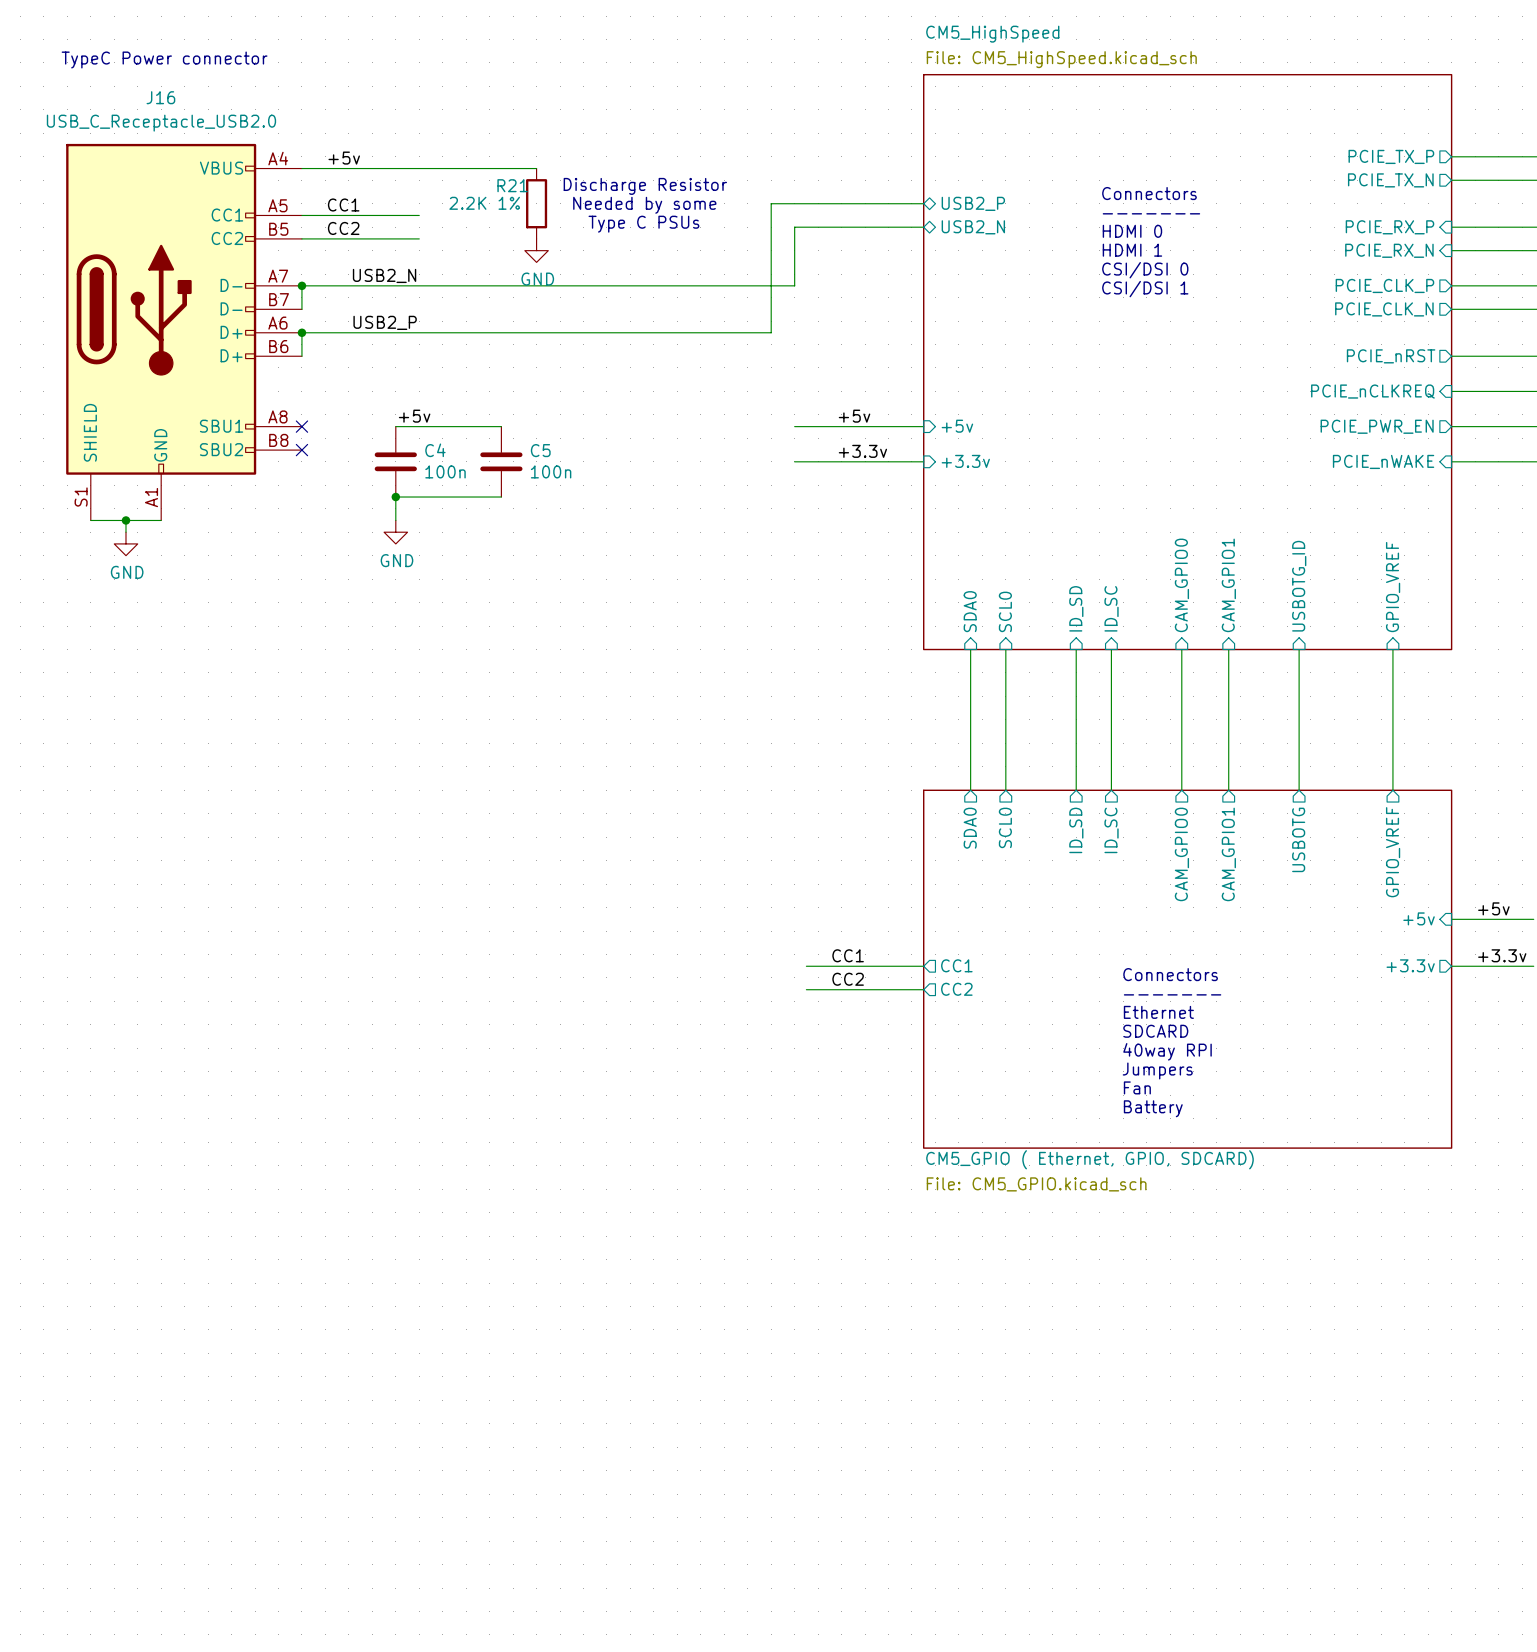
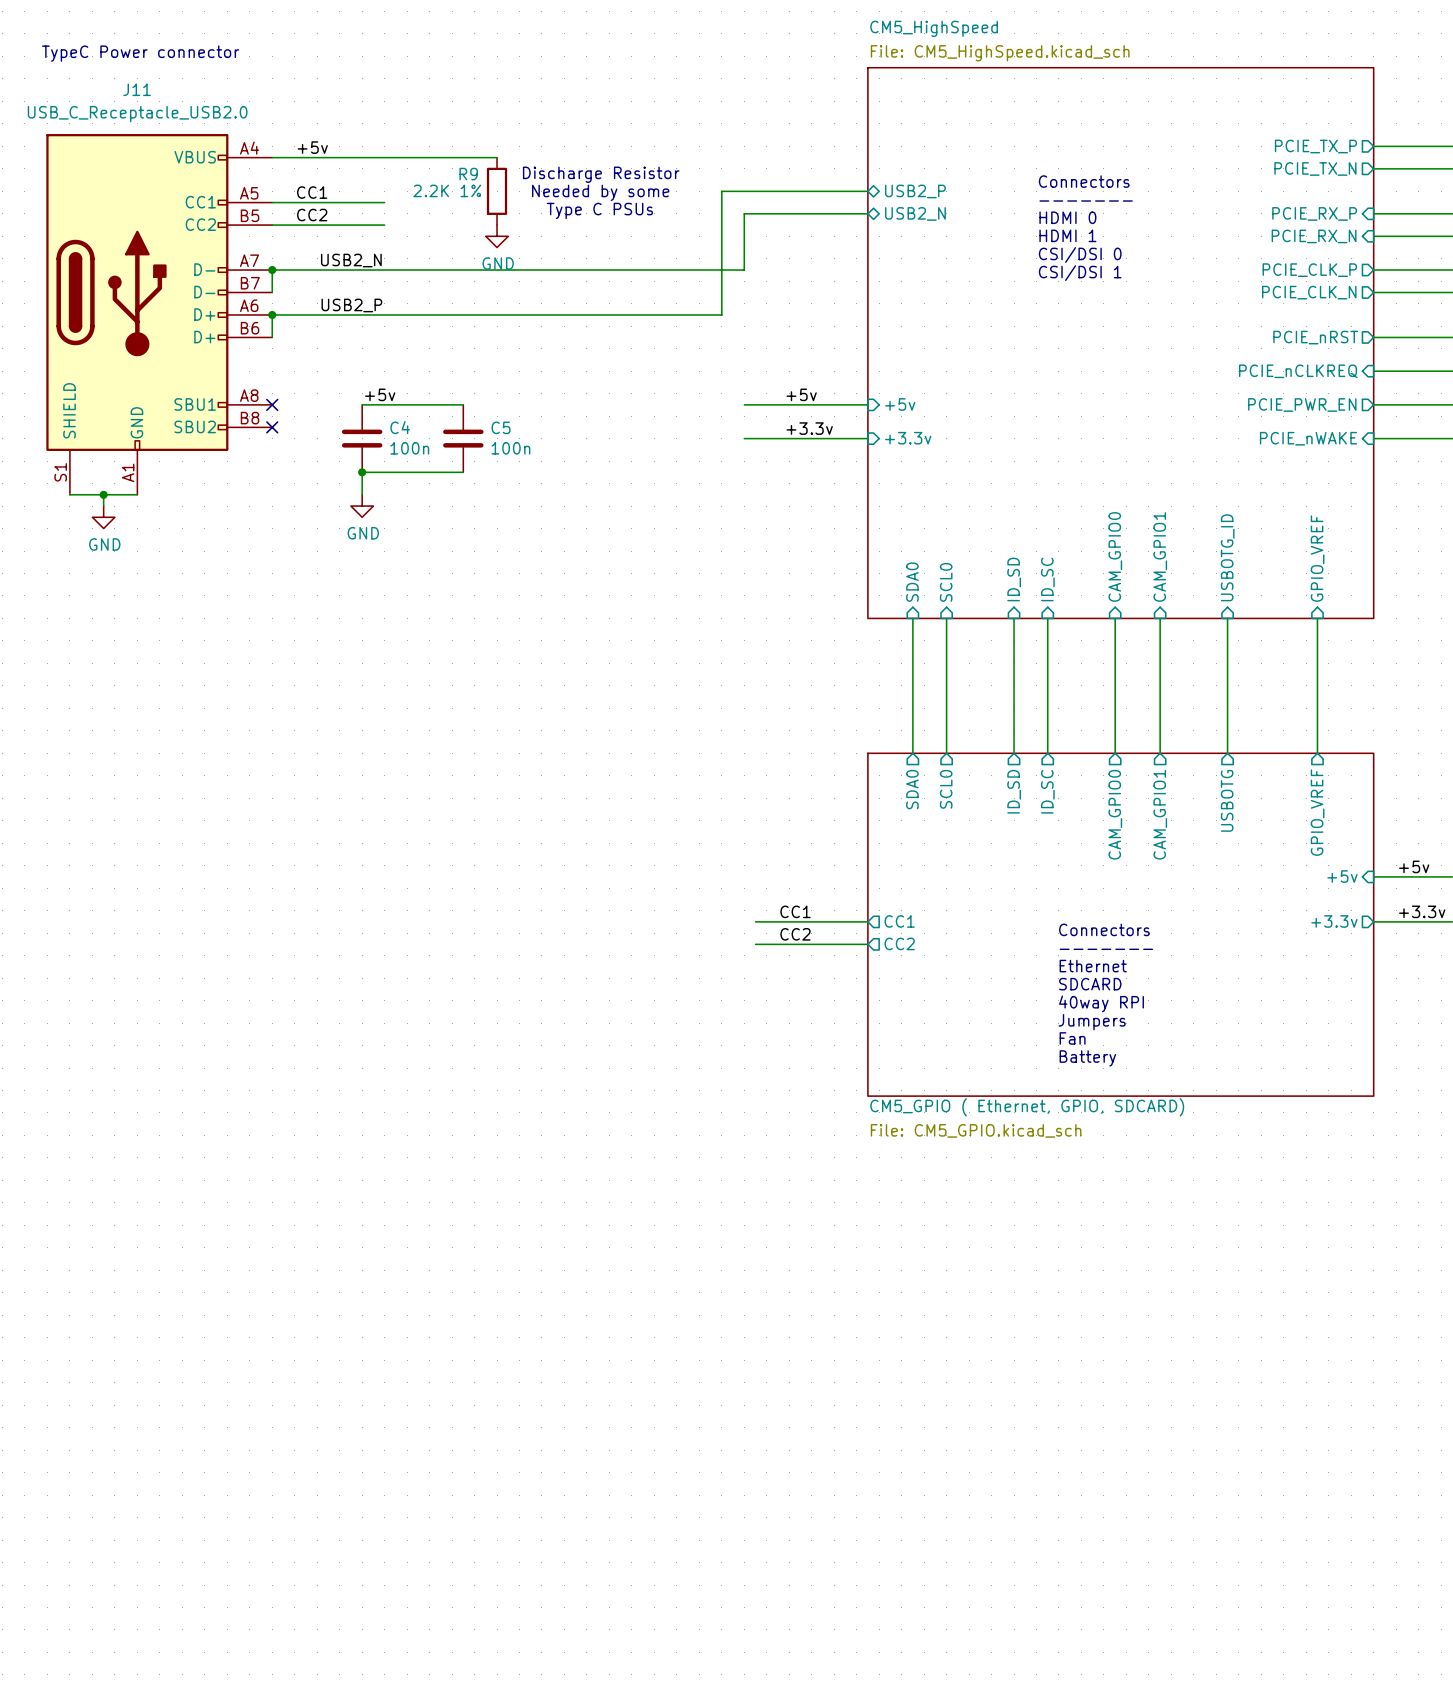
J16 name: J16 (160, 97) -> J11 (137, 89)
R21 name: R21 (512, 185) -> R9 (468, 174)

